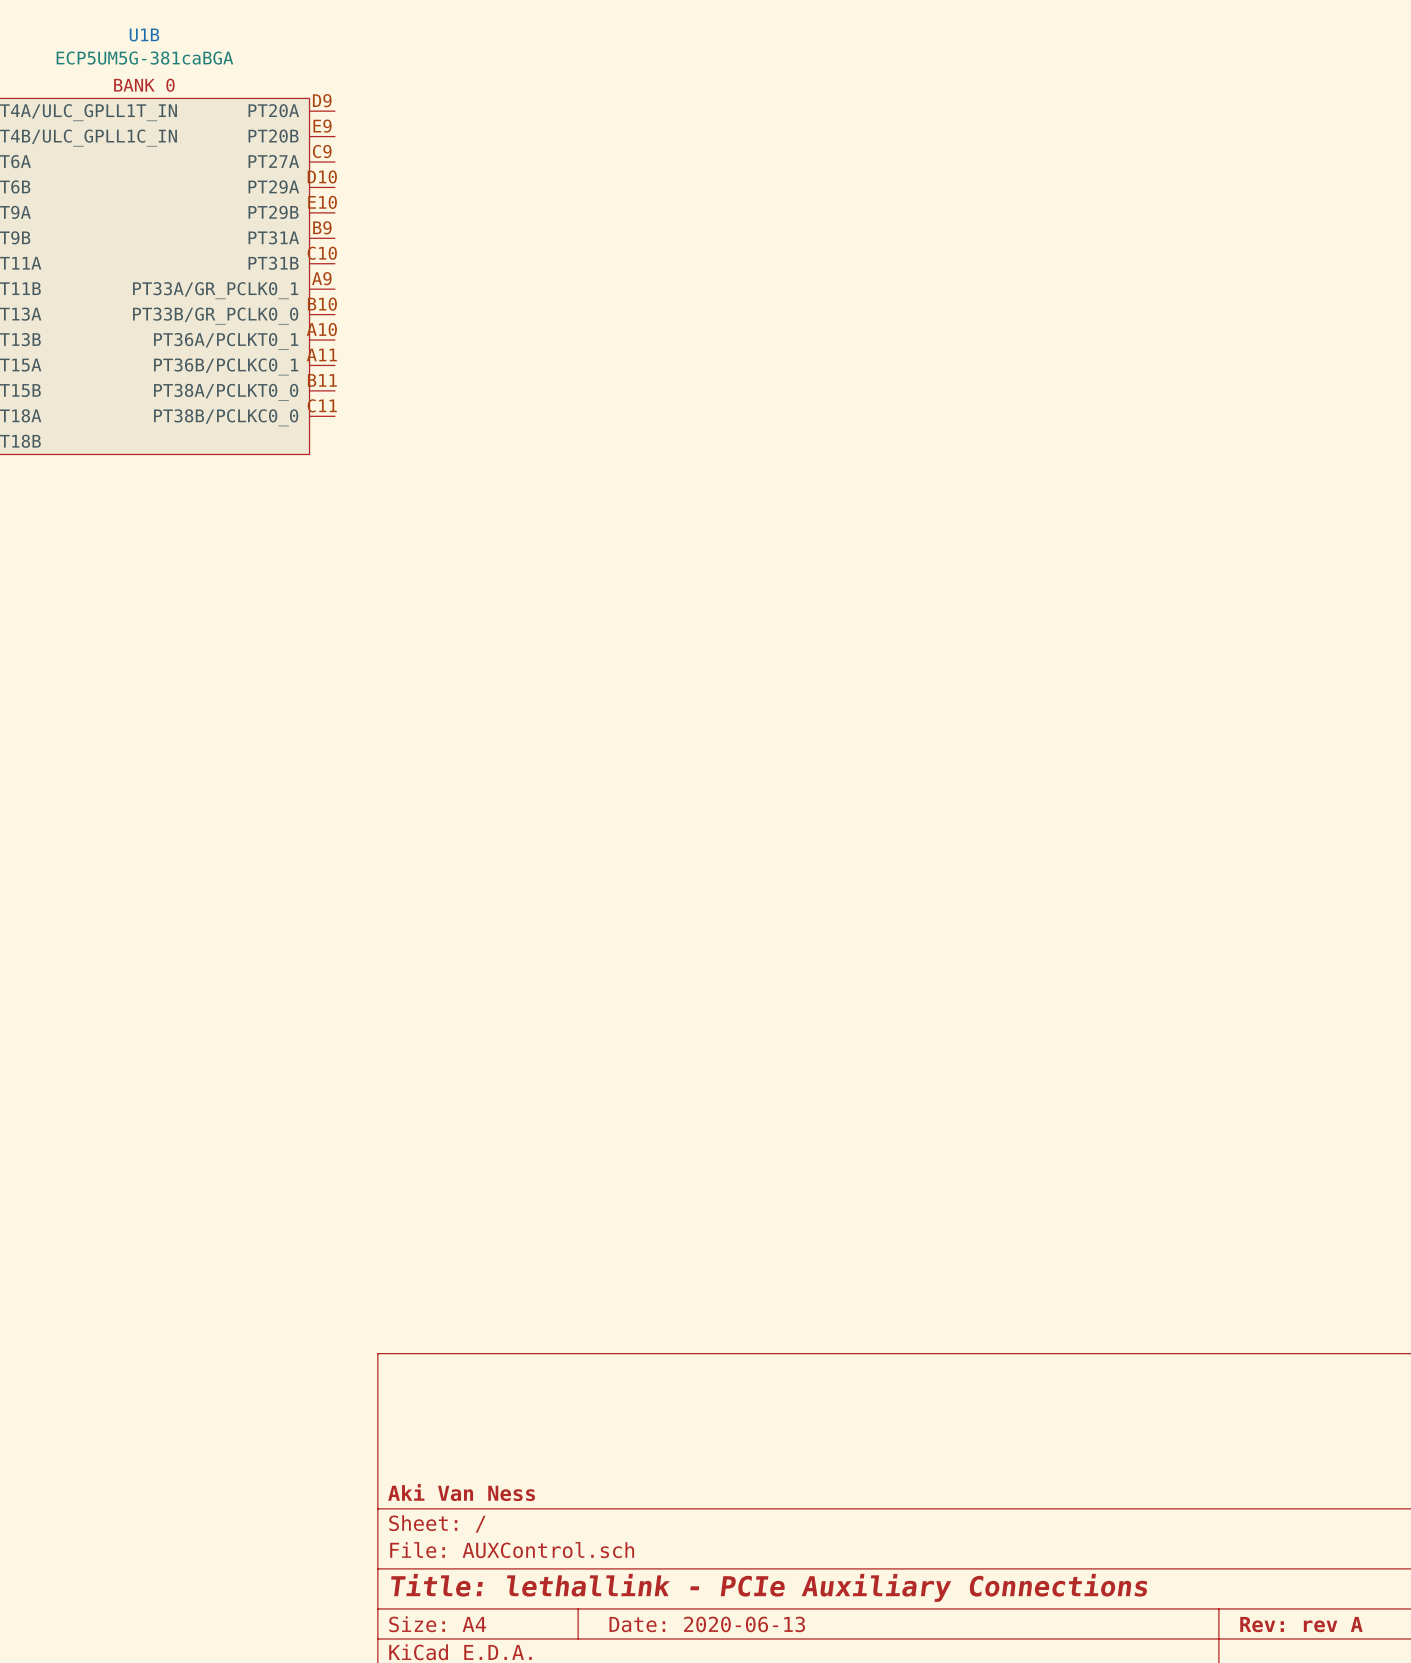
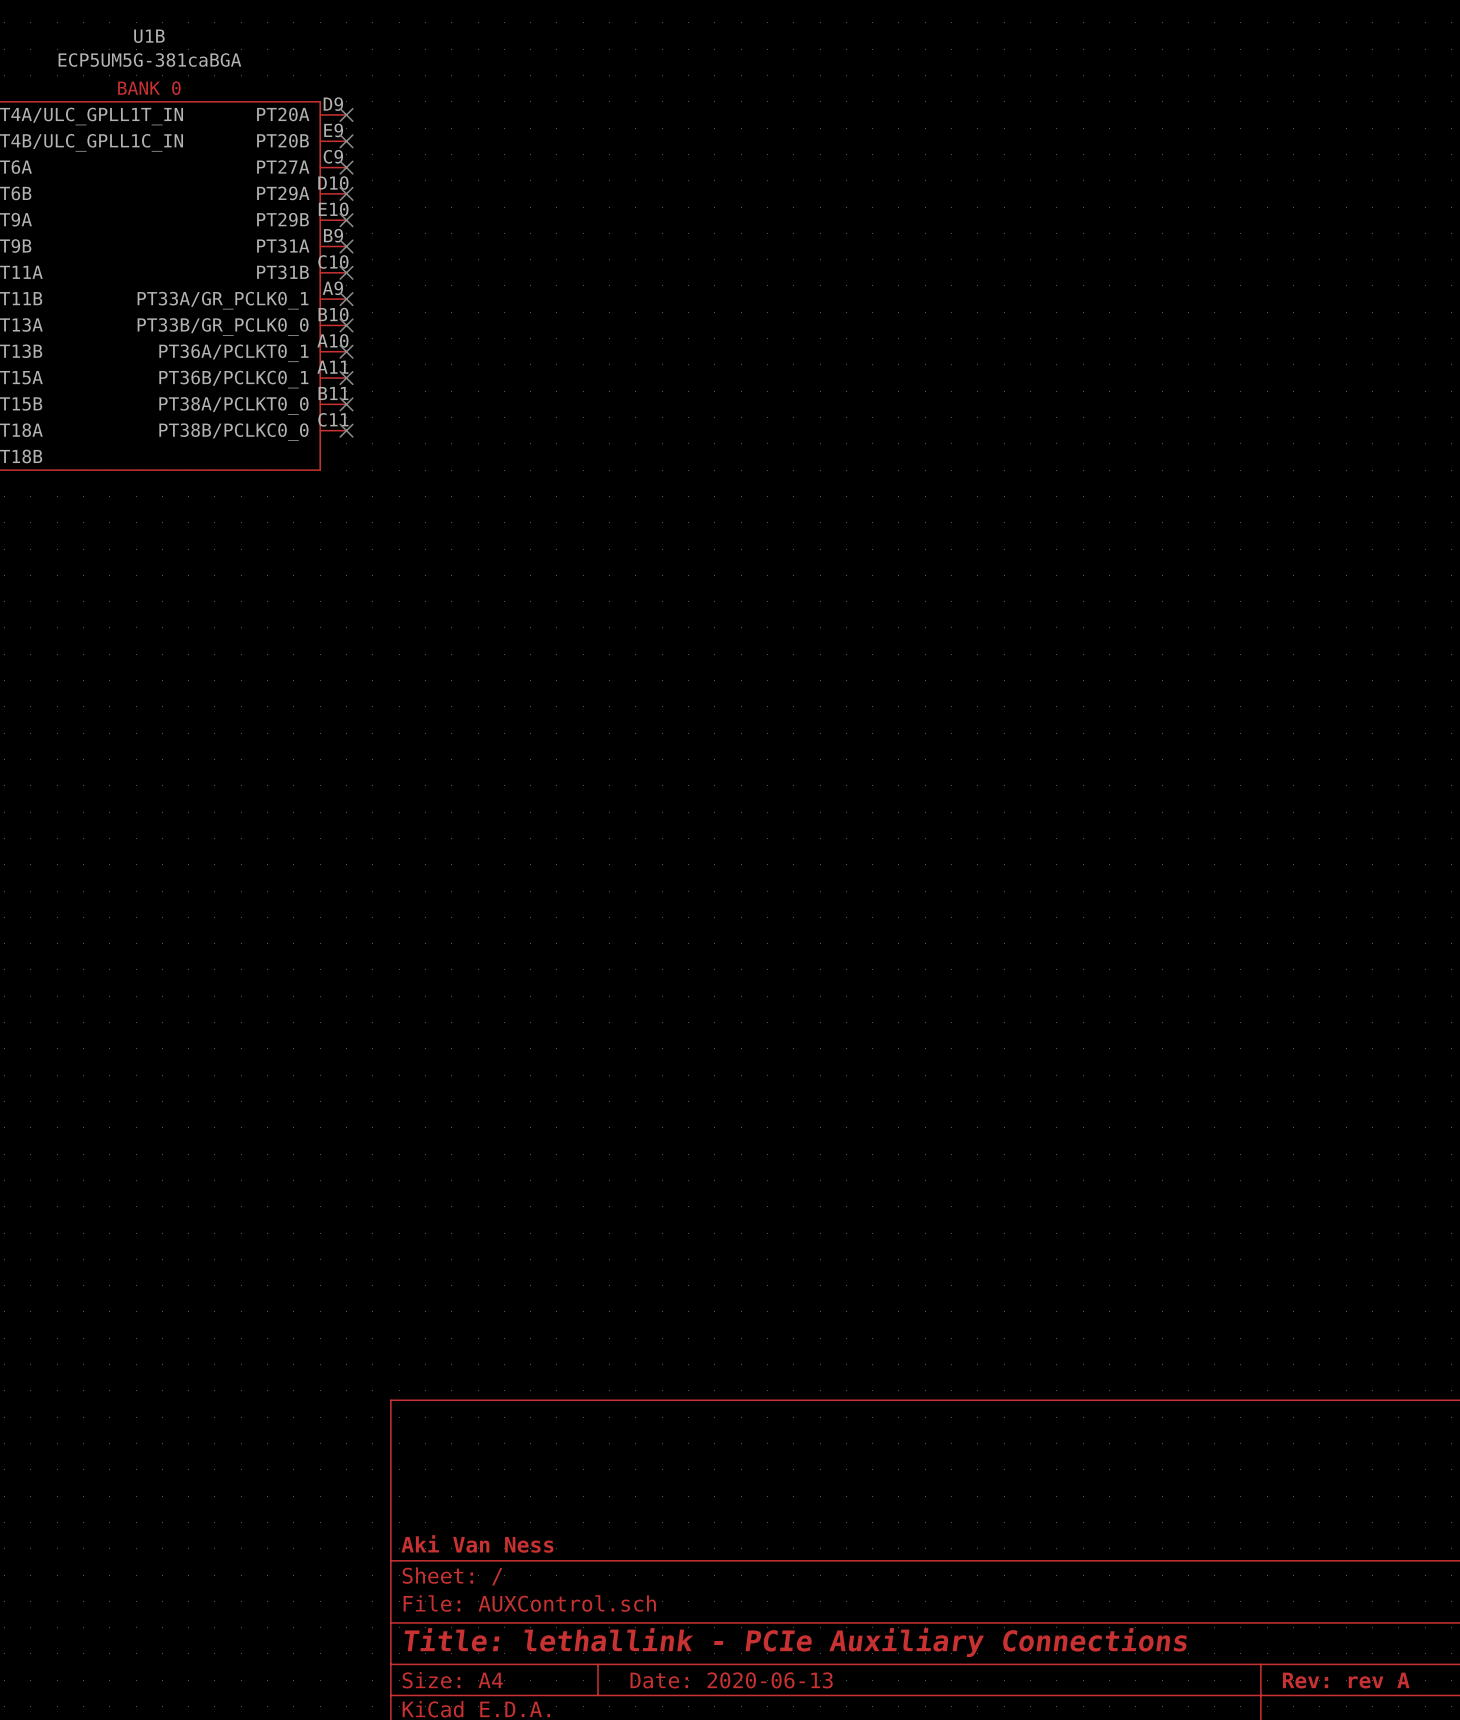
no-connect mark: none -> (346, 114)
no-connect mark: none -> (346, 141)
no-connect mark: none -> (346, 167)
no-connect mark: none -> (346, 193)
no-connect mark: none -> (346, 220)
no-connect mark: none -> (346, 246)
no-connect mark: none -> (346, 272)
no-connect mark: none -> (346, 299)
no-connect mark: none -> (346, 325)
no-connect mark: none -> (346, 351)
no-connect mark: none -> (346, 378)
no-connect mark: none -> (346, 404)
no-connect mark: none -> (346, 430)

